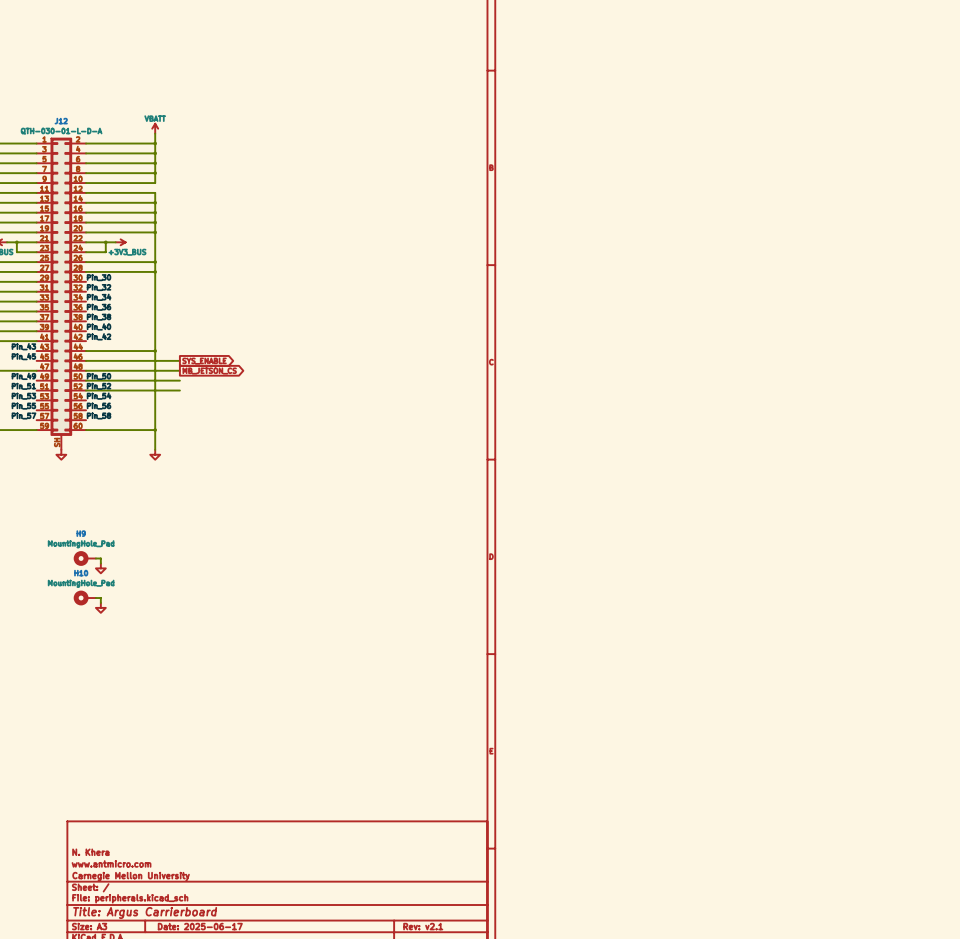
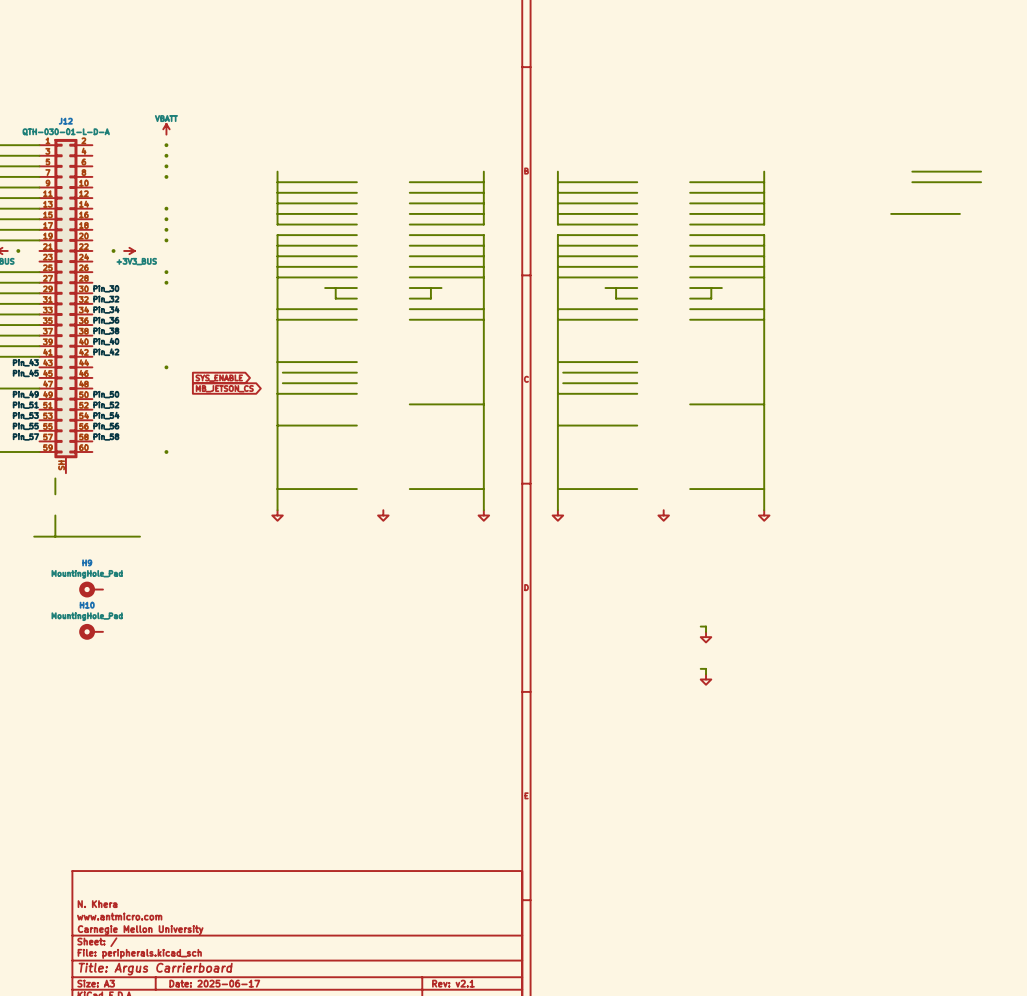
wire: (155, 133) (155, 183) (86, 183) -> none
wire: (86, 143) (155, 143) -> none
wire: (86, 153) (155, 153) -> none
wire: (86, 163) (155, 163) -> none
wire: none -> (277, 171) (277, 224) (356, 224)
wire: none -> (483, 171) (483, 224) (409, 224)
wire: none -> (557, 171) (557, 224) (637, 224)
wire: none -> (764, 171) (764, 224) (690, 224)
wire: none -> (912, 171) (981, 171)
wire: (86, 173) (155, 173) -> none
wire: none -> (277, 182) (356, 182)
wire: none -> (409, 182) (483, 182)
wire: none -> (557, 182) (637, 182)
wire: none -> (690, 182) (764, 182)
wire: none -> (912, 182) (981, 182)
wire: none -> (277, 192) (356, 192)
wire: none -> (409, 192) (483, 192)
wire: none -> (557, 192) (637, 192)
wire: none -> (690, 192) (764, 192)
wire: (86, 192) (155, 192) (155, 449) -> none
wire: none -> (277, 203) (356, 203)
wire: none -> (409, 203) (483, 203)
wire: none -> (557, 203) (637, 203)
wire: none -> (690, 203) (764, 203)
wire: (86, 202) (155, 202) -> none
wire: none -> (277, 213) (356, 213)
wire: none -> (409, 213) (483, 213)
wire: none -> (557, 213) (637, 213)
wire: none -> (690, 213) (764, 213)
wire: none -> (891, 213) (959, 213)
wire: (86, 212) (155, 212) -> none
wire: (86, 222) (155, 222) -> none
wire: none -> (356, 235) (277, 235) (277, 510)
wire: none -> (409, 235) (483, 235) (483, 510)
wire: none -> (637, 235) (557, 235) (557, 510)
wire: none -> (690, 235) (764, 235) (764, 510)
wire: (86, 232) (155, 232) -> none
wire: none -> (277, 245) (356, 245)
wire: none -> (409, 245) (483, 245)
wire: none -> (557, 245) (637, 245)
wire: none -> (690, 245) (764, 245)
wire: (7, 242) (36, 242) -> none
wire: (16, 242) (16, 252) (36, 252) -> none
wire: (86, 242) (115, 242) -> none
wire: (105, 242) (105, 252) (86, 252) -> none
wire: none -> (277, 256) (356, 256)
wire: none -> (409, 256) (483, 256)
wire: none -> (557, 256) (637, 256)
wire: none -> (690, 256) (764, 256)
wire: none -> (277, 266) (356, 266)
wire: none -> (409, 266) (483, 266)
wire: none -> (557, 266) (637, 266)
wire: none -> (690, 266) (764, 266)
wire: (86, 262) (155, 262) -> none
wire: none -> (277, 277) (356, 277)
wire: none -> (409, 277) (483, 277)
wire: none -> (557, 277) (637, 277)
wire: none -> (690, 277) (764, 277)
wire: (86, 271) (155, 271) -> none
wire: none -> (325, 288) (356, 288)
wire: none -> (335, 288) (335, 298) (356, 298)
wire: none -> (409, 288) (441, 288)
wire: none -> (430, 288) (430, 298) (409, 298)
wire: none -> (605, 288) (637, 288)
wire: none -> (616, 288) (616, 298) (637, 298)
wire: none -> (690, 288) (721, 288)
wire: none -> (711, 288) (711, 298) (690, 298)
wire: none -> (277, 309) (356, 309)
wire: none -> (409, 309) (483, 309)
wire: none -> (557, 309) (637, 309)
wire: none -> (690, 309) (764, 309)
wire: none -> (277, 319) (356, 319)
wire: none -> (409, 319) (483, 319)
wire: none -> (557, 319) (637, 319)
wire: none -> (690, 319) (764, 319)
wire: none -> (277, 362) (356, 362)
wire: none -> (557, 362) (637, 362)
wire: (86, 351) (155, 351) -> none
wire: none -> (282, 372) (356, 372)
wire: none -> (563, 372) (637, 372)
wire: (86, 360) (179, 360) -> none
wire: none -> (282, 383) (356, 383)
wire: none -> (563, 383) (637, 383)
wire: (86, 370) (179, 370) -> none
wire: none -> (277, 393) (356, 393)
wire: none -> (557, 393) (637, 393)
wire: (86, 380) (179, 380) -> none
wire: none -> (409, 404) (483, 404)
wire: none -> (690, 404) (764, 404)
wire: (86, 390) (179, 390) -> none
wire: none -> (277, 425) (356, 425)
wire: none -> (557, 425) (637, 425)
wire: (86, 430) (155, 430) -> none
wire: none -> (55, 478) (55, 494)
power symbol: (61, 454) -> none
power symbol: (155, 454) -> none
wire: none -> (277, 489) (356, 489)
wire: none -> (409, 489) (483, 489)
wire: none -> (557, 489) (637, 489)
wire: none -> (690, 489) (764, 489)
wire: none -> (55, 515) (55, 536)
power symbol: none -> (277, 515)
power symbol: none -> (383, 515)
power symbol: none -> (483, 515)
power symbol: none -> (557, 515)
power symbol: none -> (663, 515)
power symbol: none -> (764, 515)
wire: none -> (34, 536) (140, 536)
wire: (95, 558) (100, 558) (100, 563) -> none
power symbol: (100, 568) -> none
wire: none -> (700, 626) (706, 626) (706, 631)
wire: (95, 598) (100, 598) (100, 602) -> none
power symbol: none -> (706, 637)
power symbol: (100, 607) -> none
wire: none -> (700, 668) (706, 668) (706, 674)
power symbol: none -> (706, 679)

